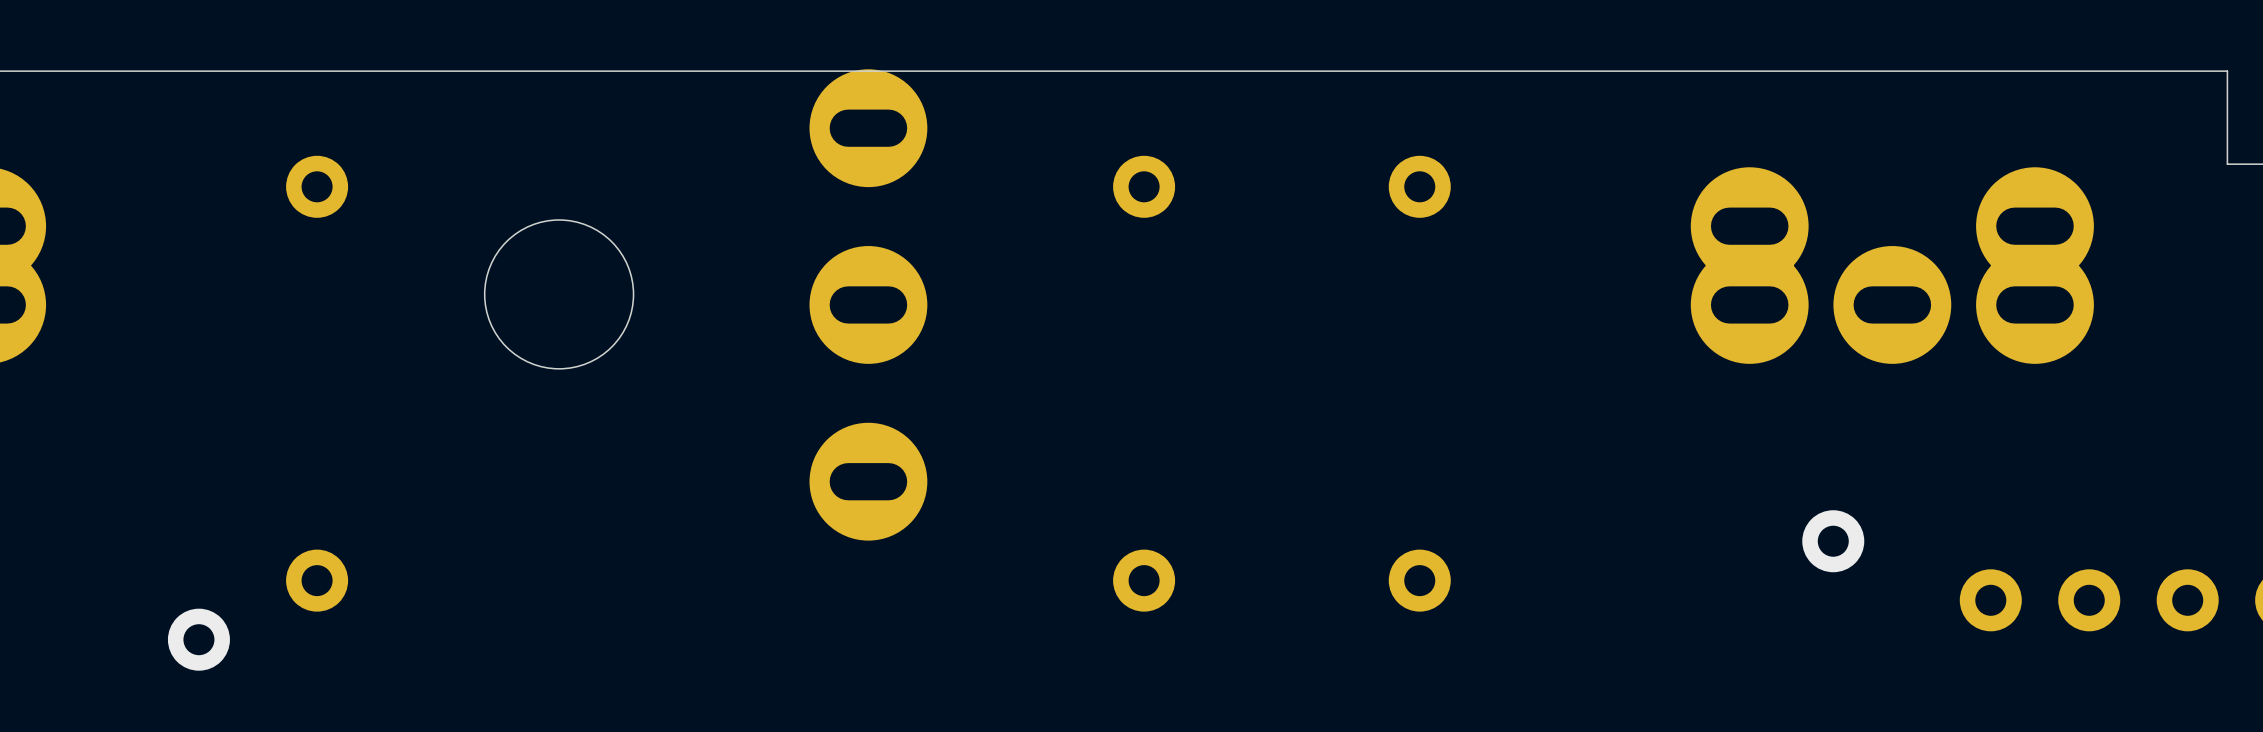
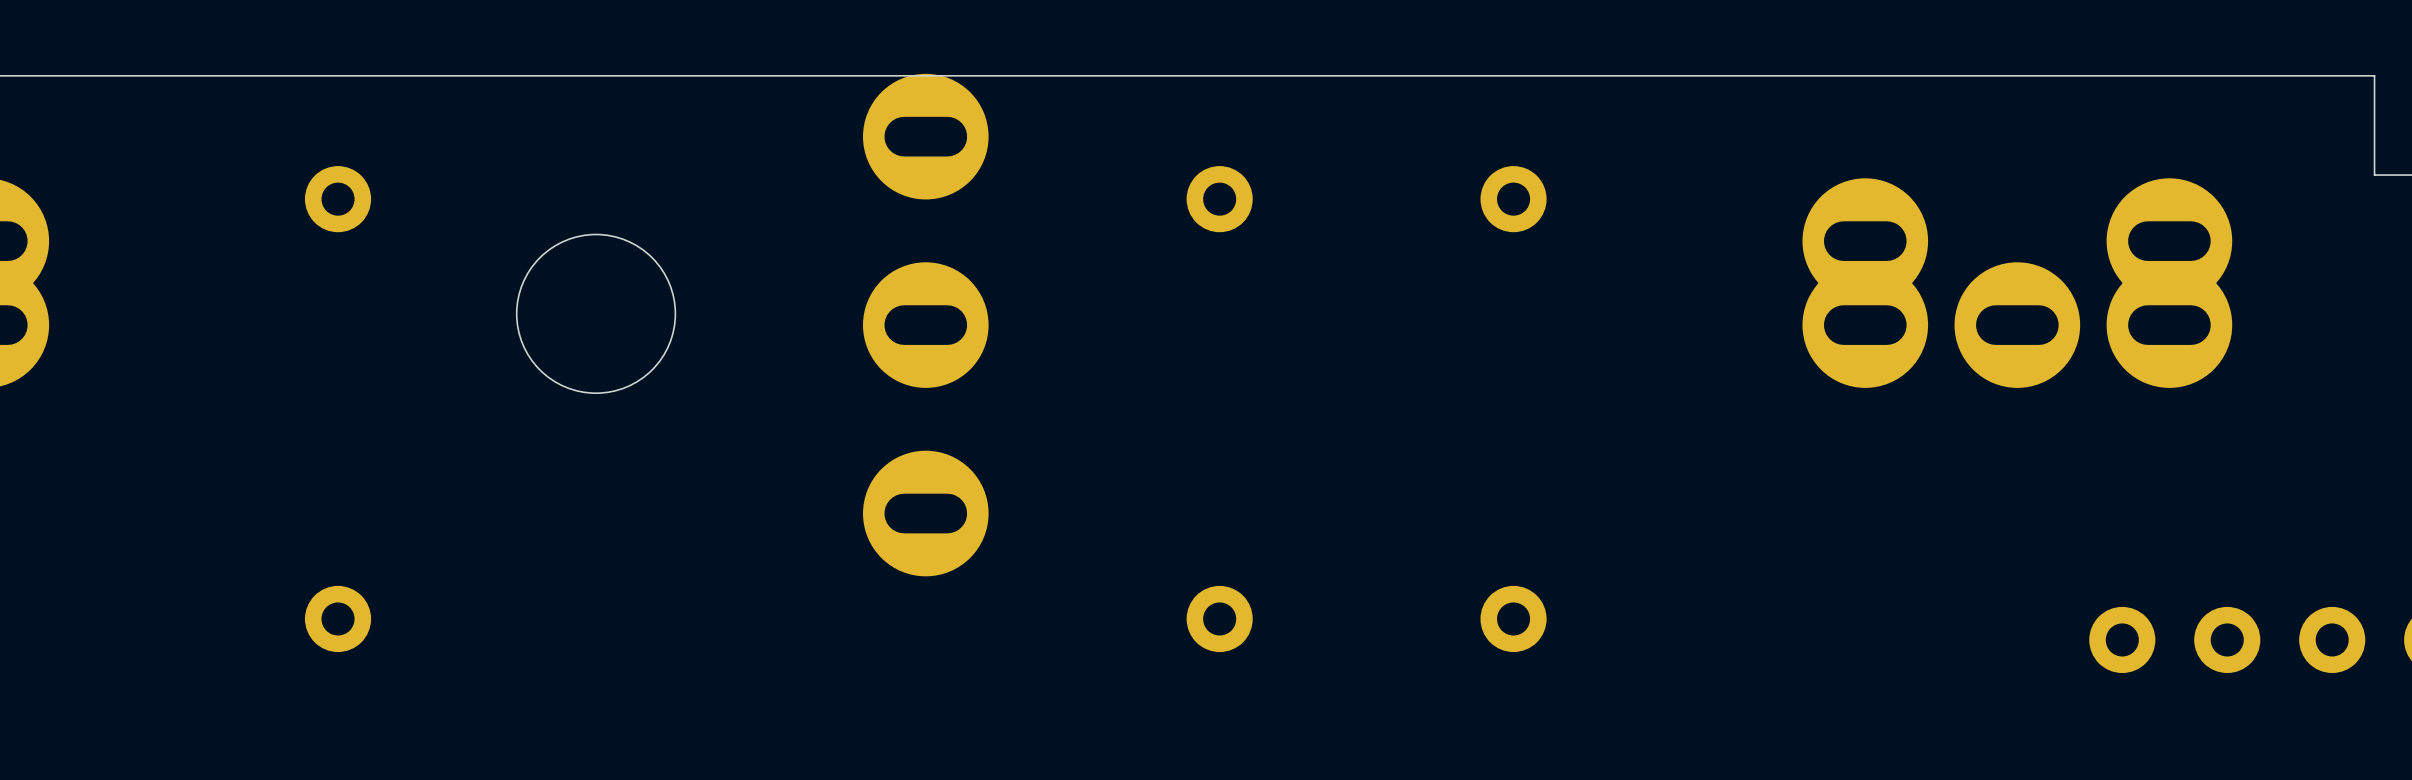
via: (1833, 541) -> none
via: (198, 639) -> none

